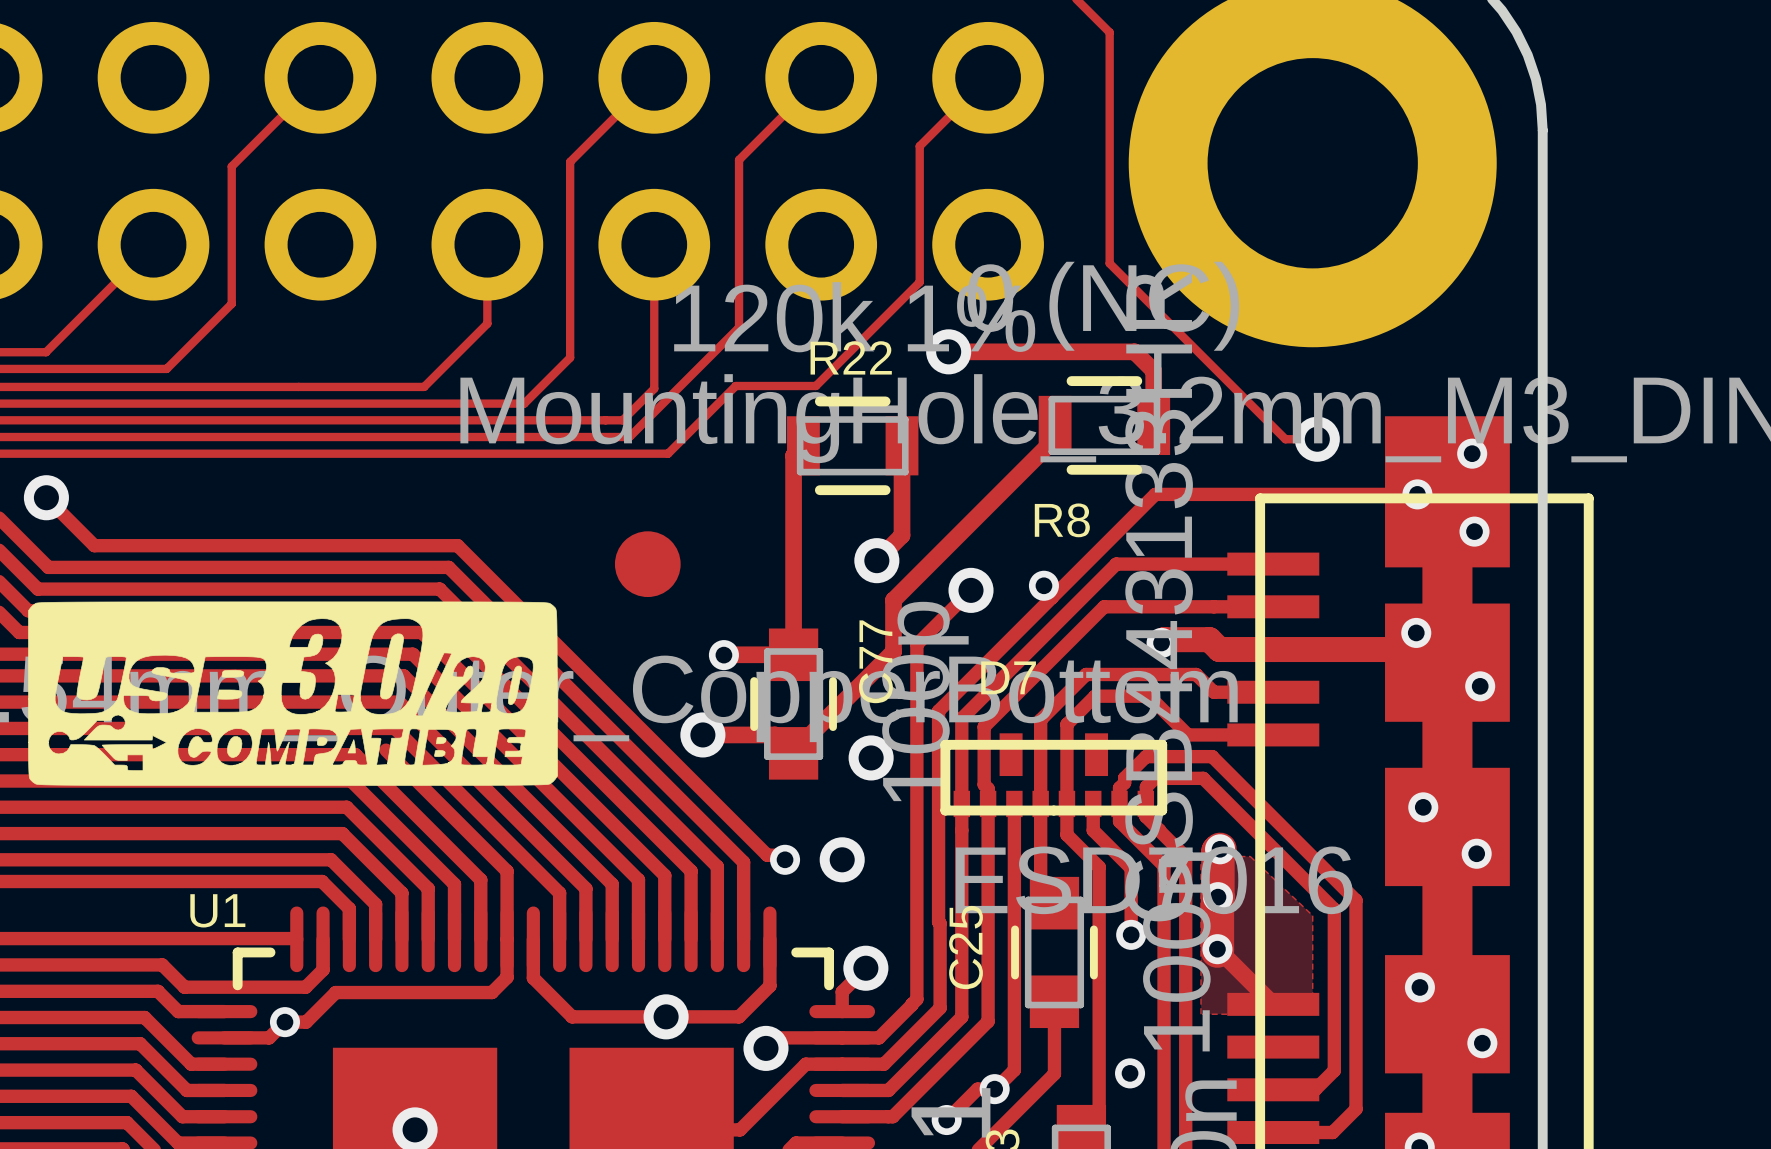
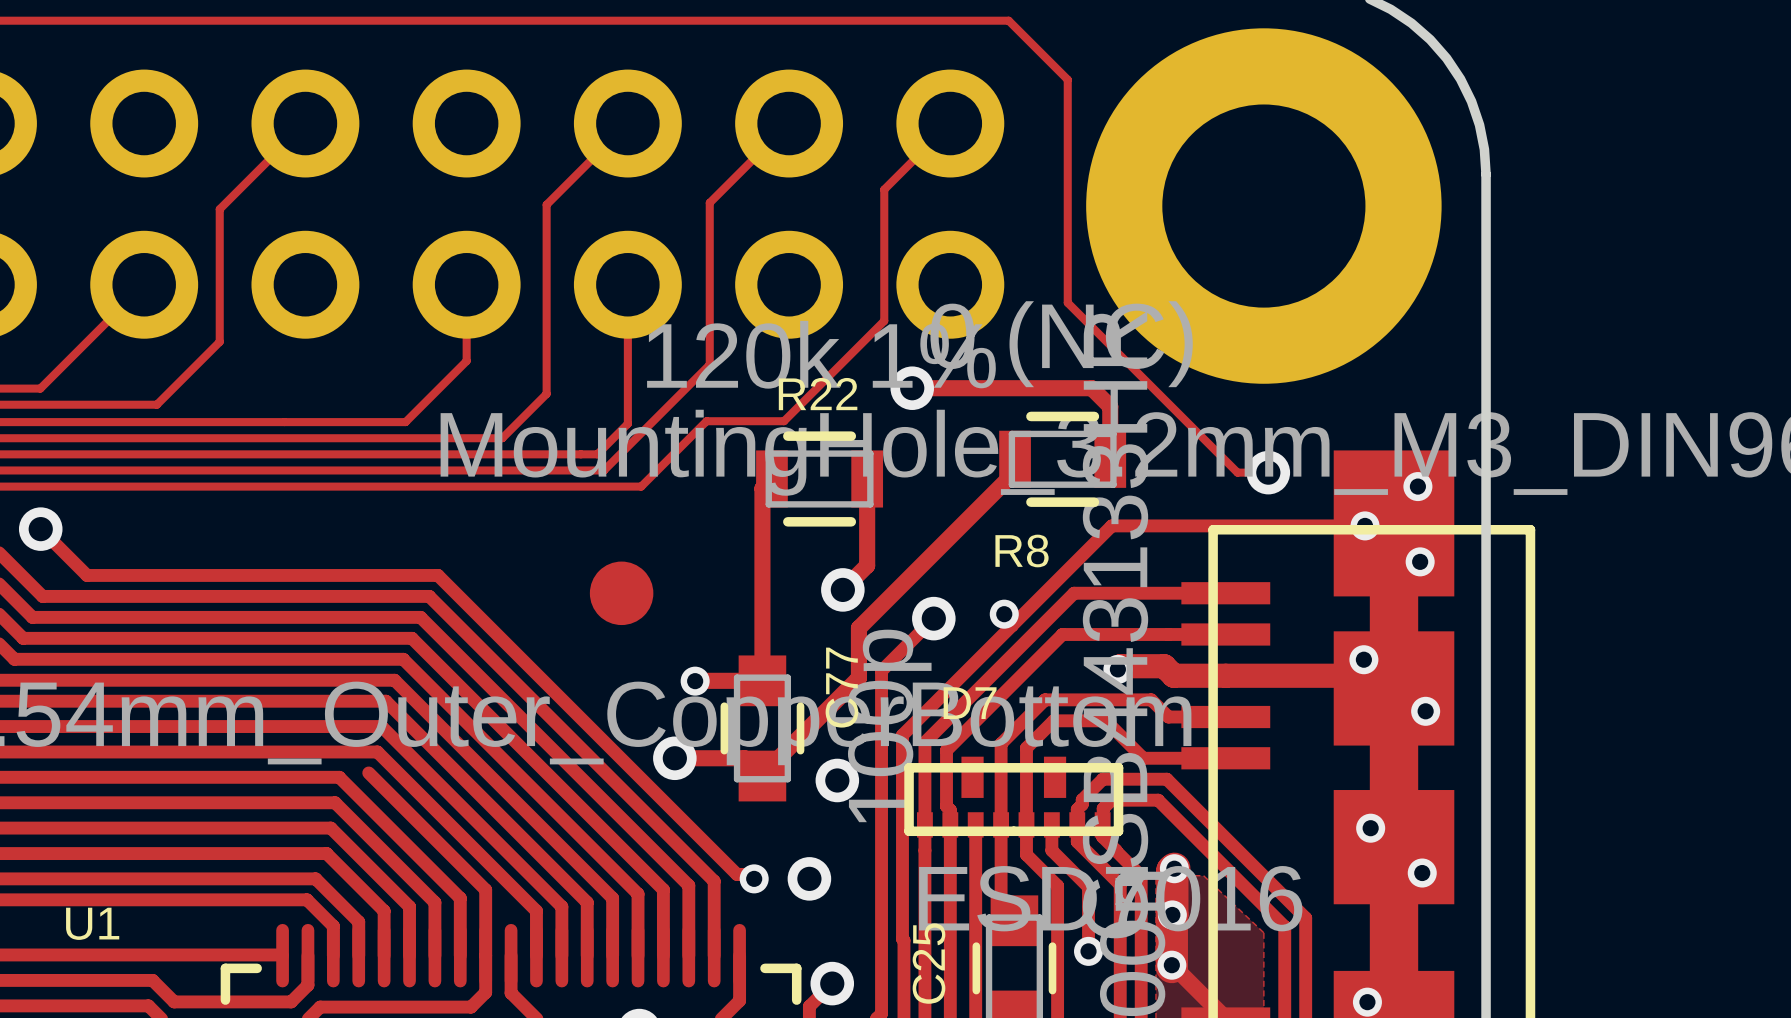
drawing: [28, 601, 558, 786] -> none
U1 name position: U1 (217, 910) -> U1 (92, 923)

